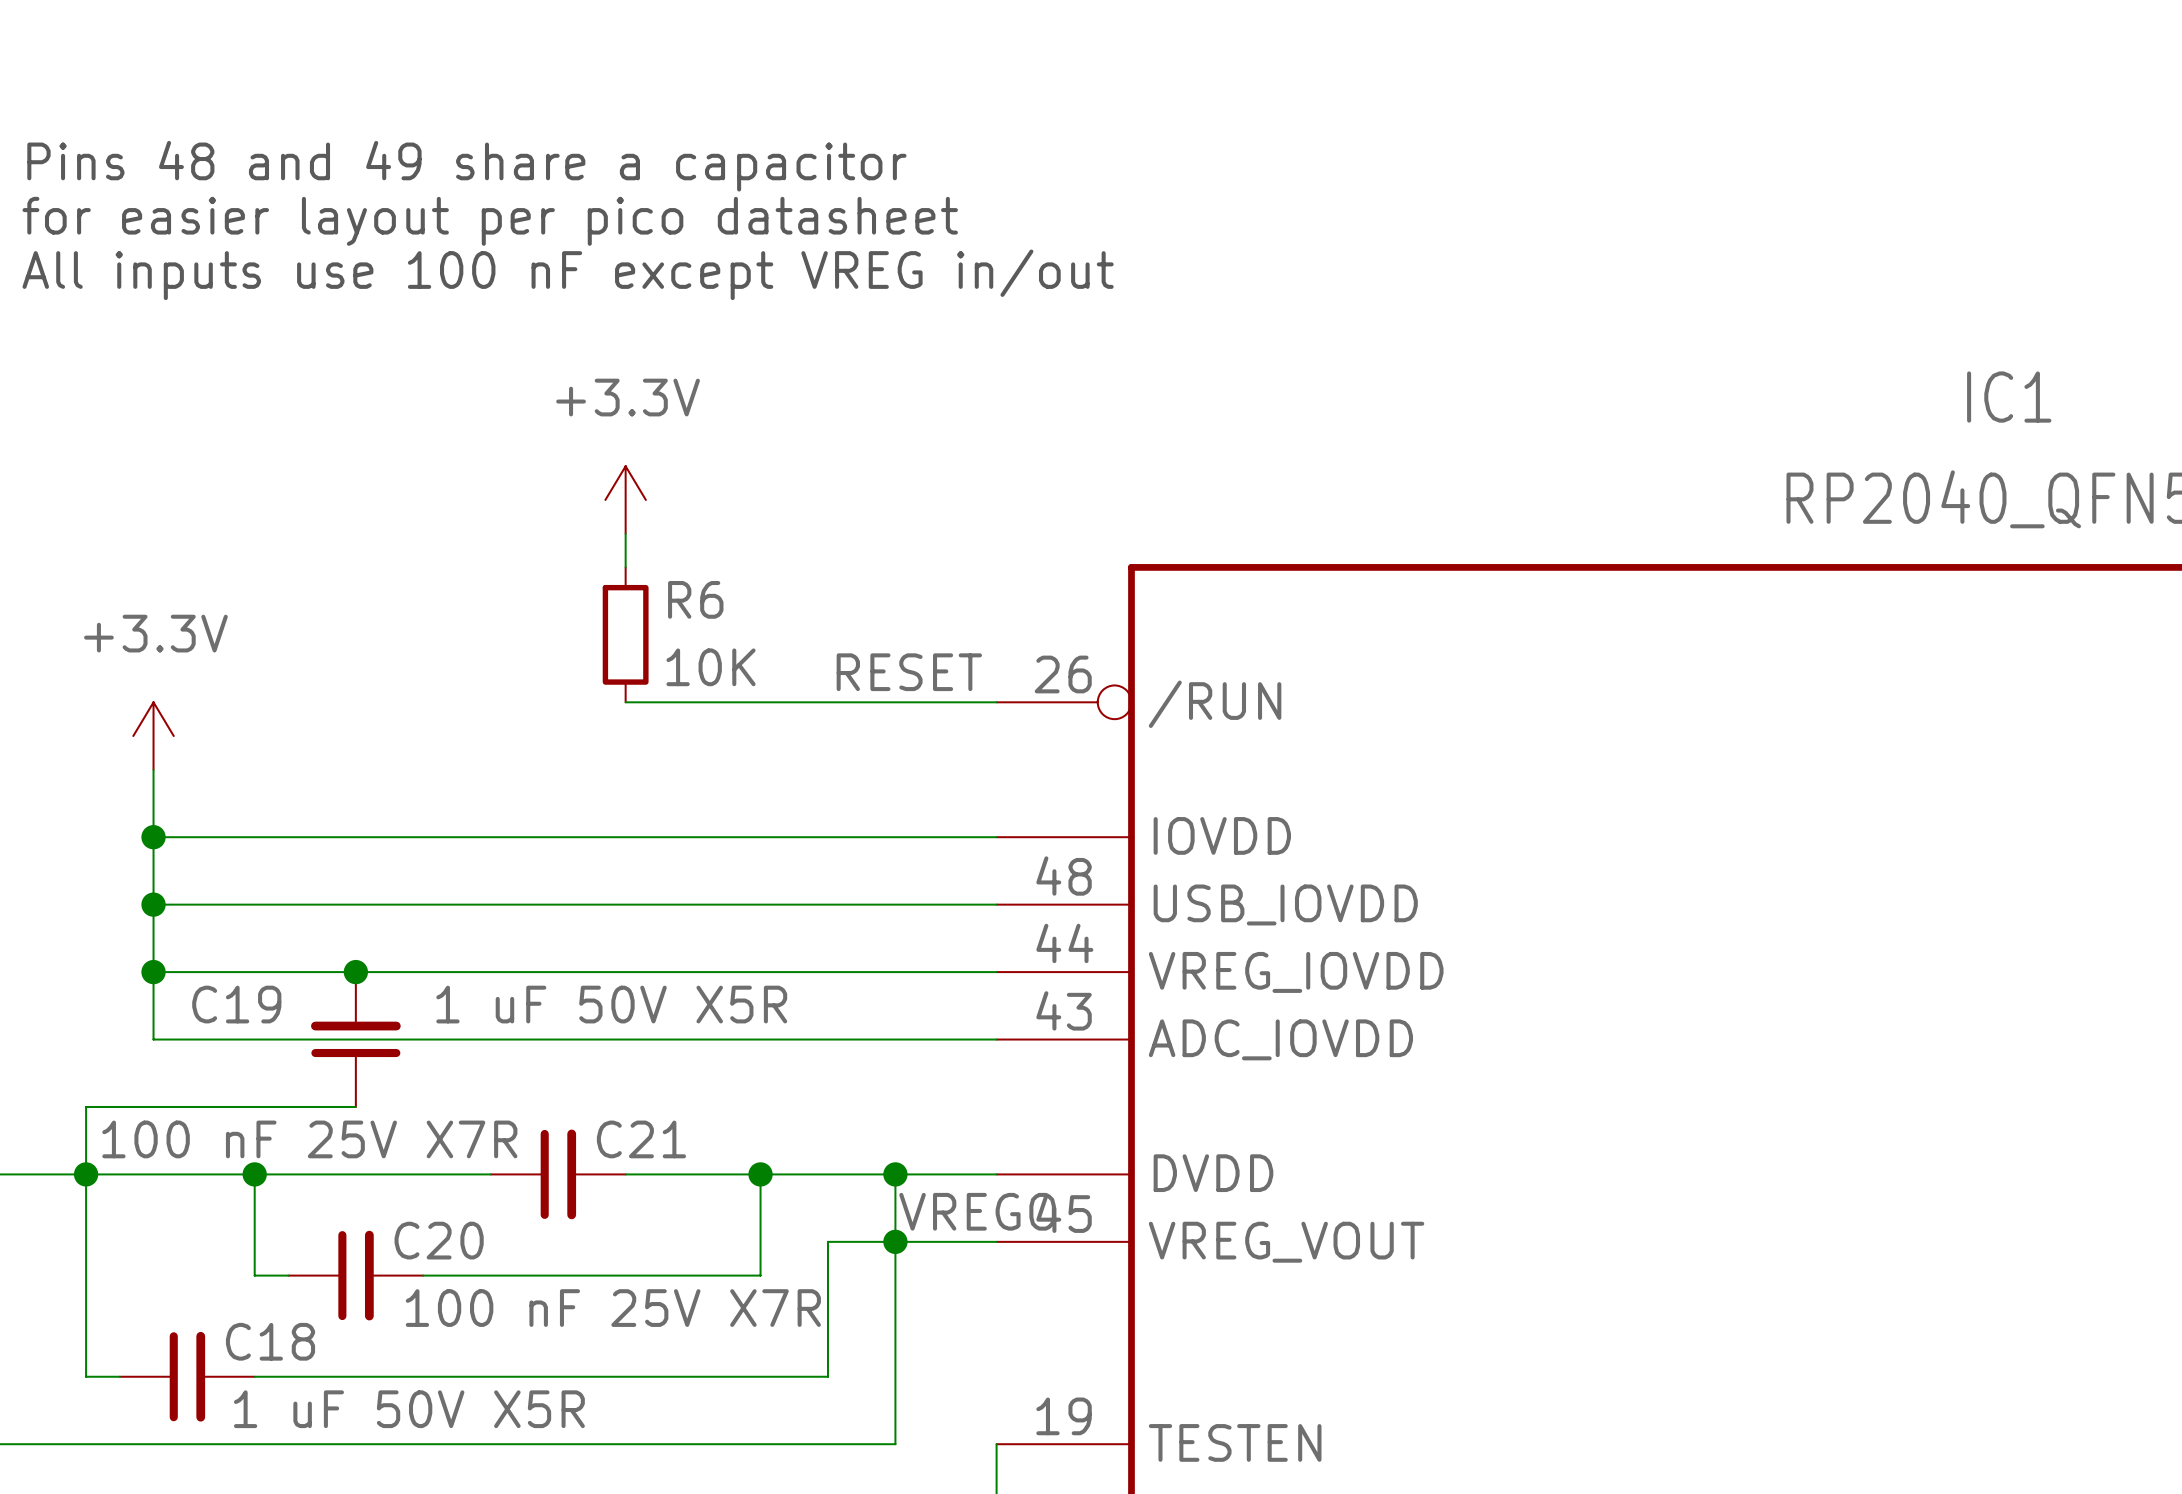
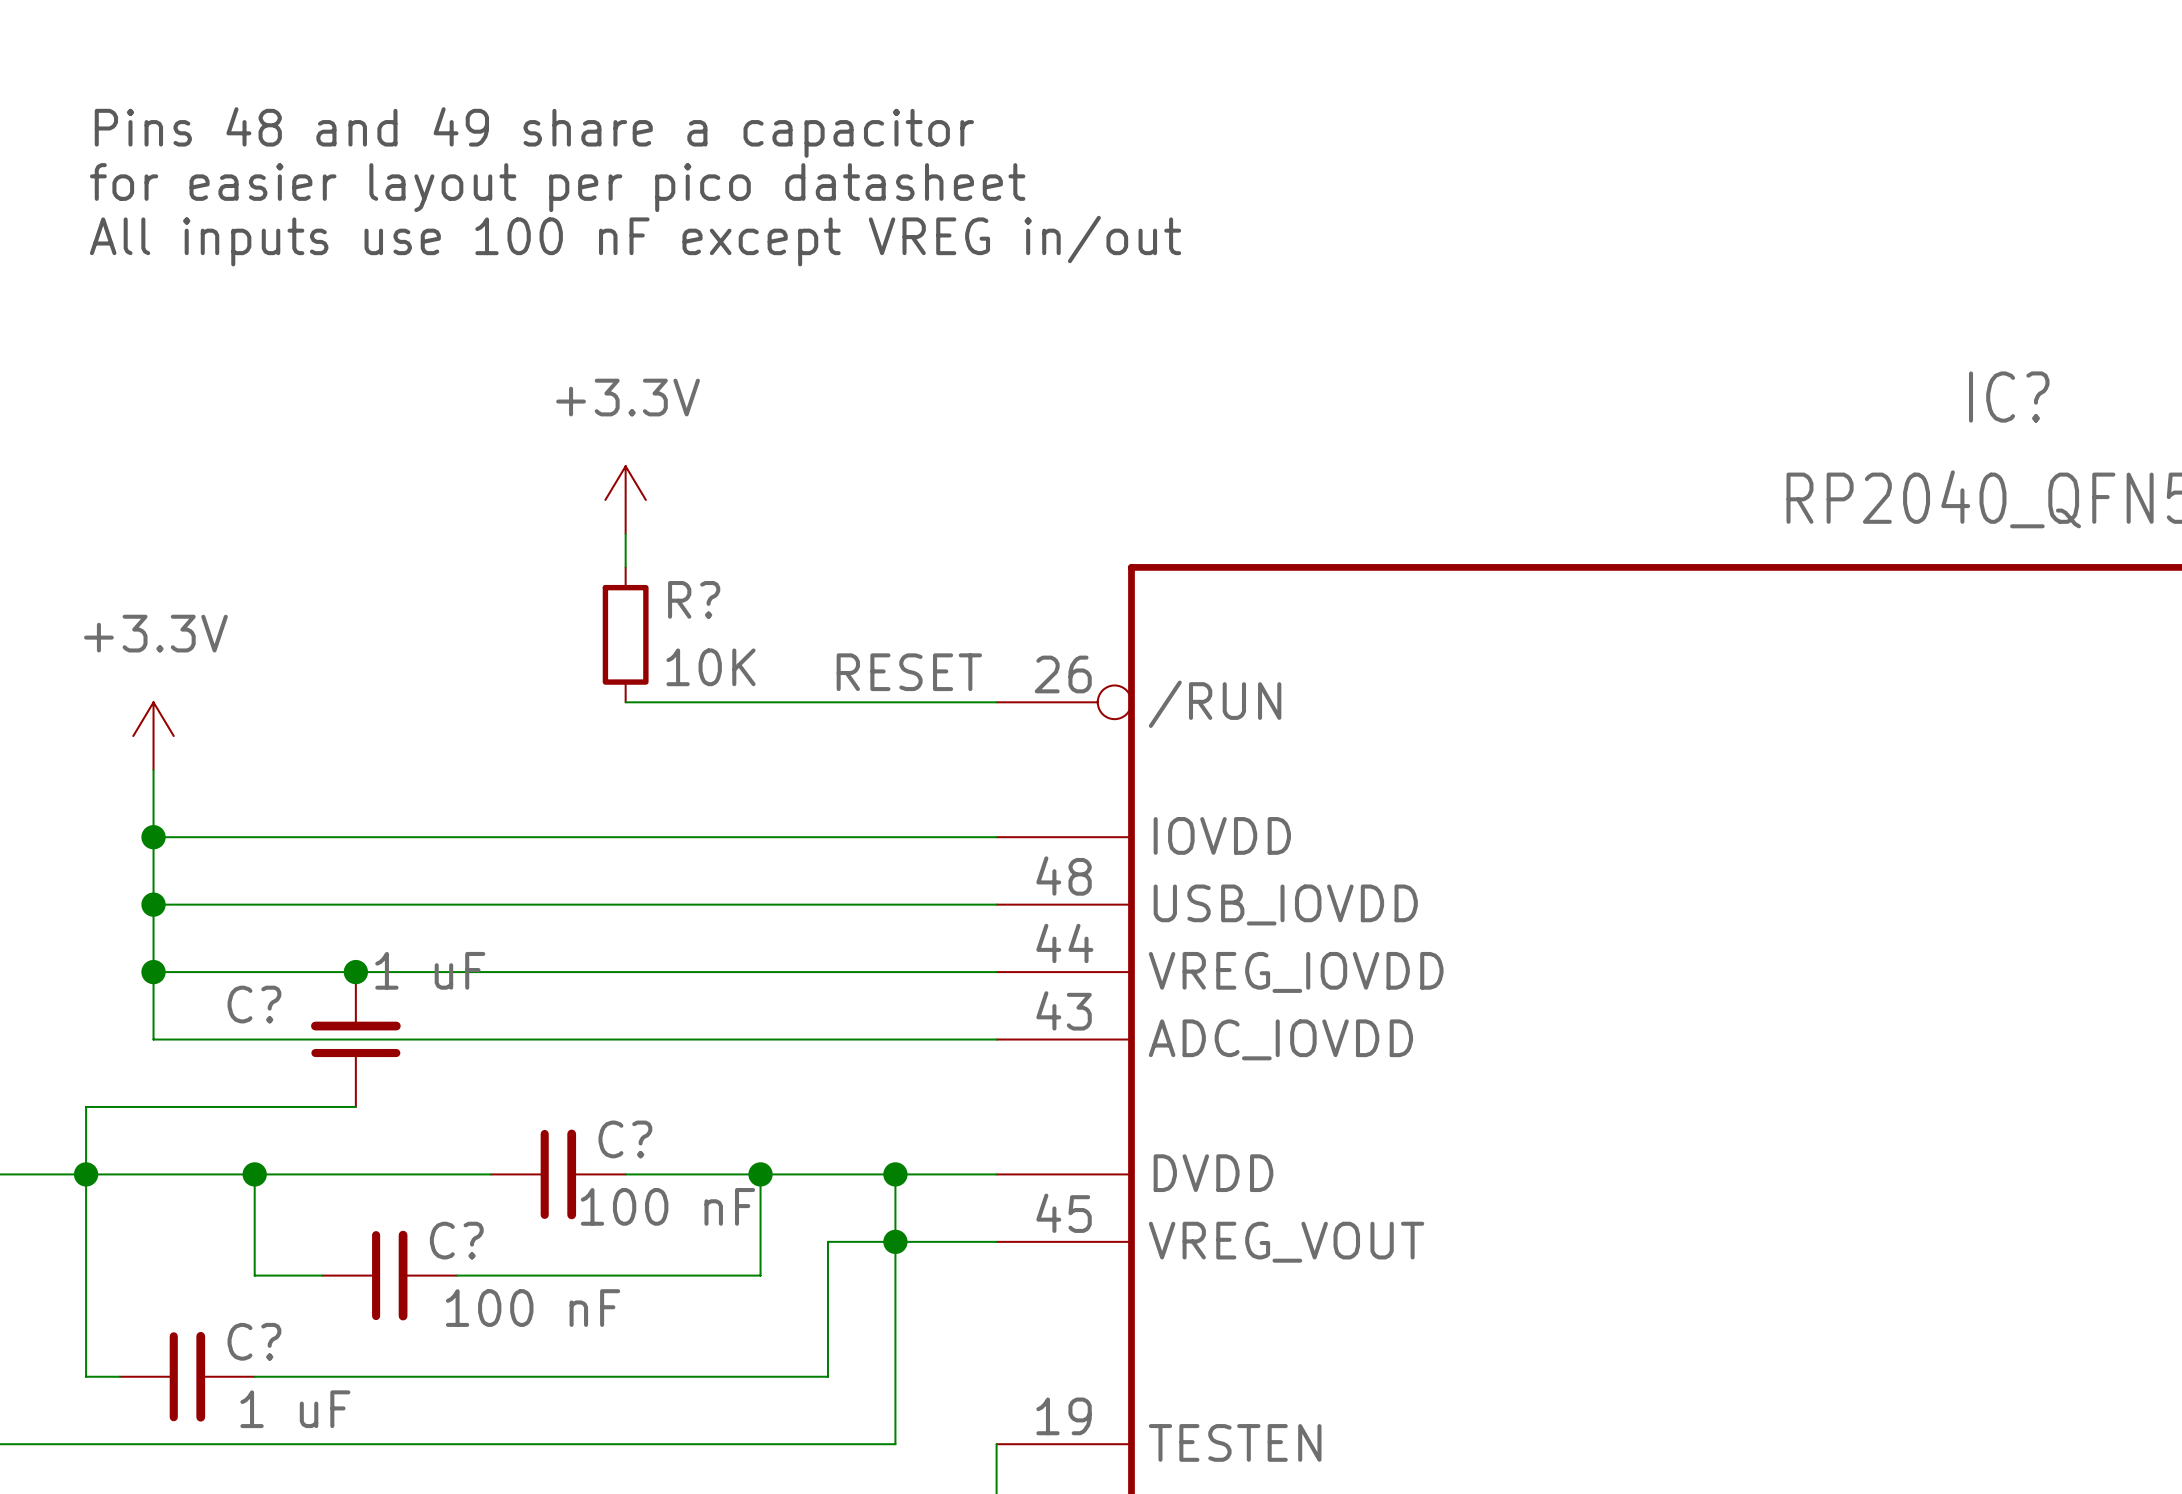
text position: Pins 48 and 49 share a capacitor (466, 166) -> Pins 48 and 49 share a capacitor (534, 132)
text position: for easier layout per pico datasheet (490, 221) -> for easier layout per pico datasheet (557, 187)
text position: All inputs use 100 nF except VREG in/out (568, 274) -> All inputs use 100 nF except VREG in/out (635, 241)
IC1 name: IC1 (2009, 397) -> IC? (2009, 397)
R6 name: R6 (695, 599) -> R? (694, 599)
C19 name: C19 (236, 1004) -> C? (254, 1004)
C19 value: 1 uF 50V X5R (611, 1004) -> 1 uF (430, 970)
C21 value: 100 nF 25V X7R (309, 1139) -> 100 nF (667, 1206)
C21 name: C21 (641, 1139) -> C? (625, 1139)
label: VREGO (977, 1211) -> none
C20: 100 nF 25V X7R (355, 1275) -> none
C?: none -> 100 nF (389, 1275)
C18 name: C18 (270, 1341) -> C? (254, 1341)
C18 value: 1 uF 50V X5R (409, 1409) -> 1 uF (295, 1409)

